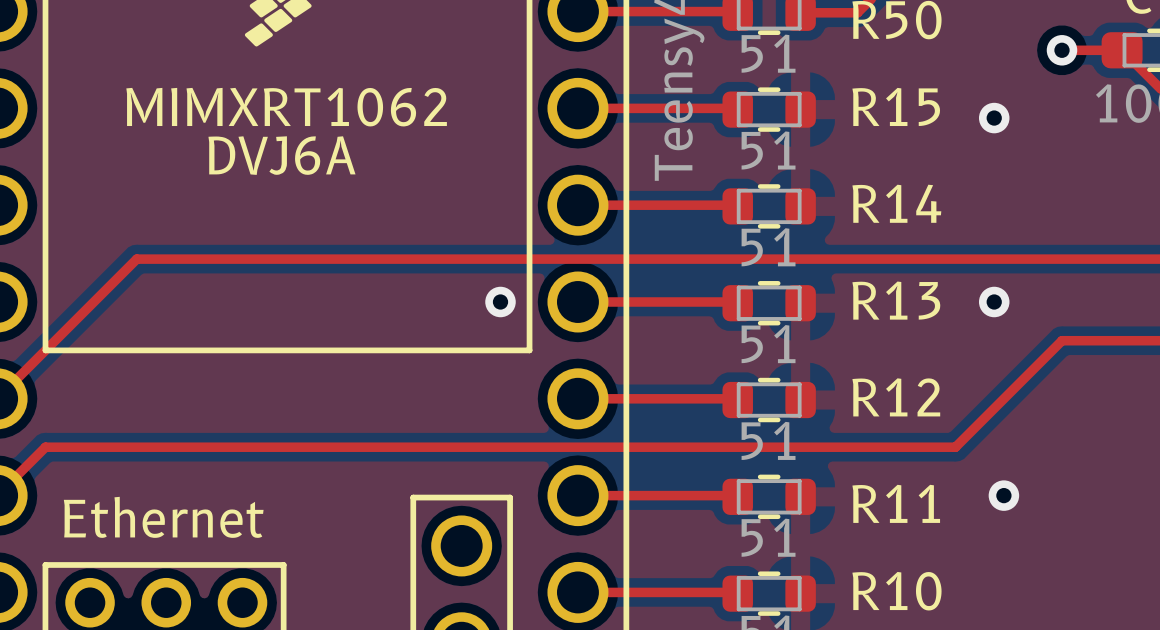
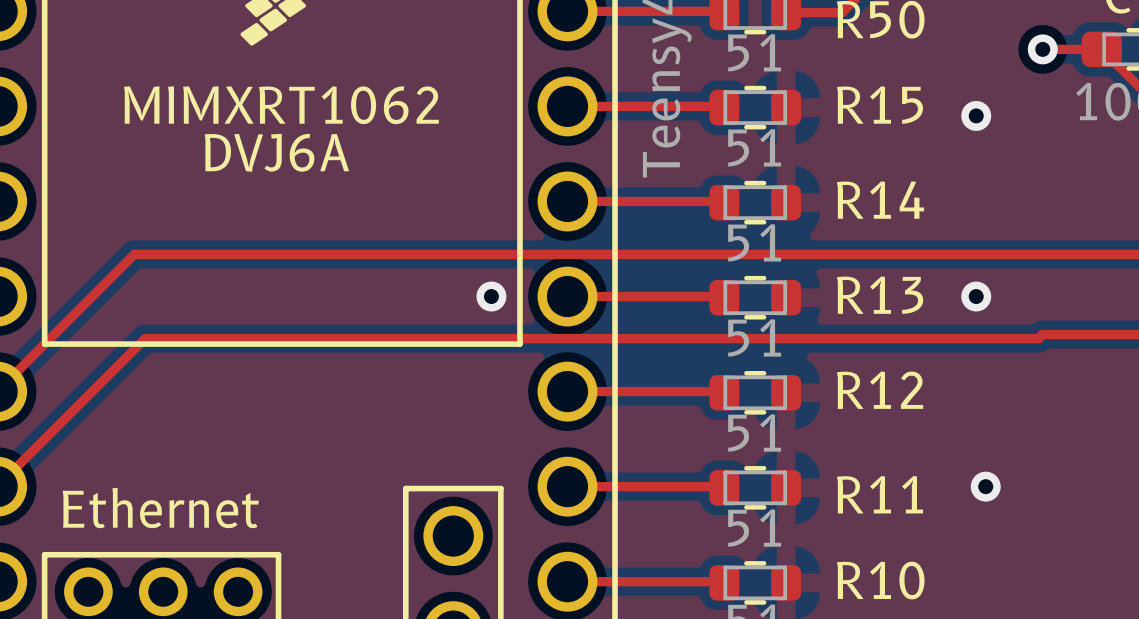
top track: (1057, 344) (955, 447) (45, 447) -> (1038, 338) (145, 338) (44, 439)

